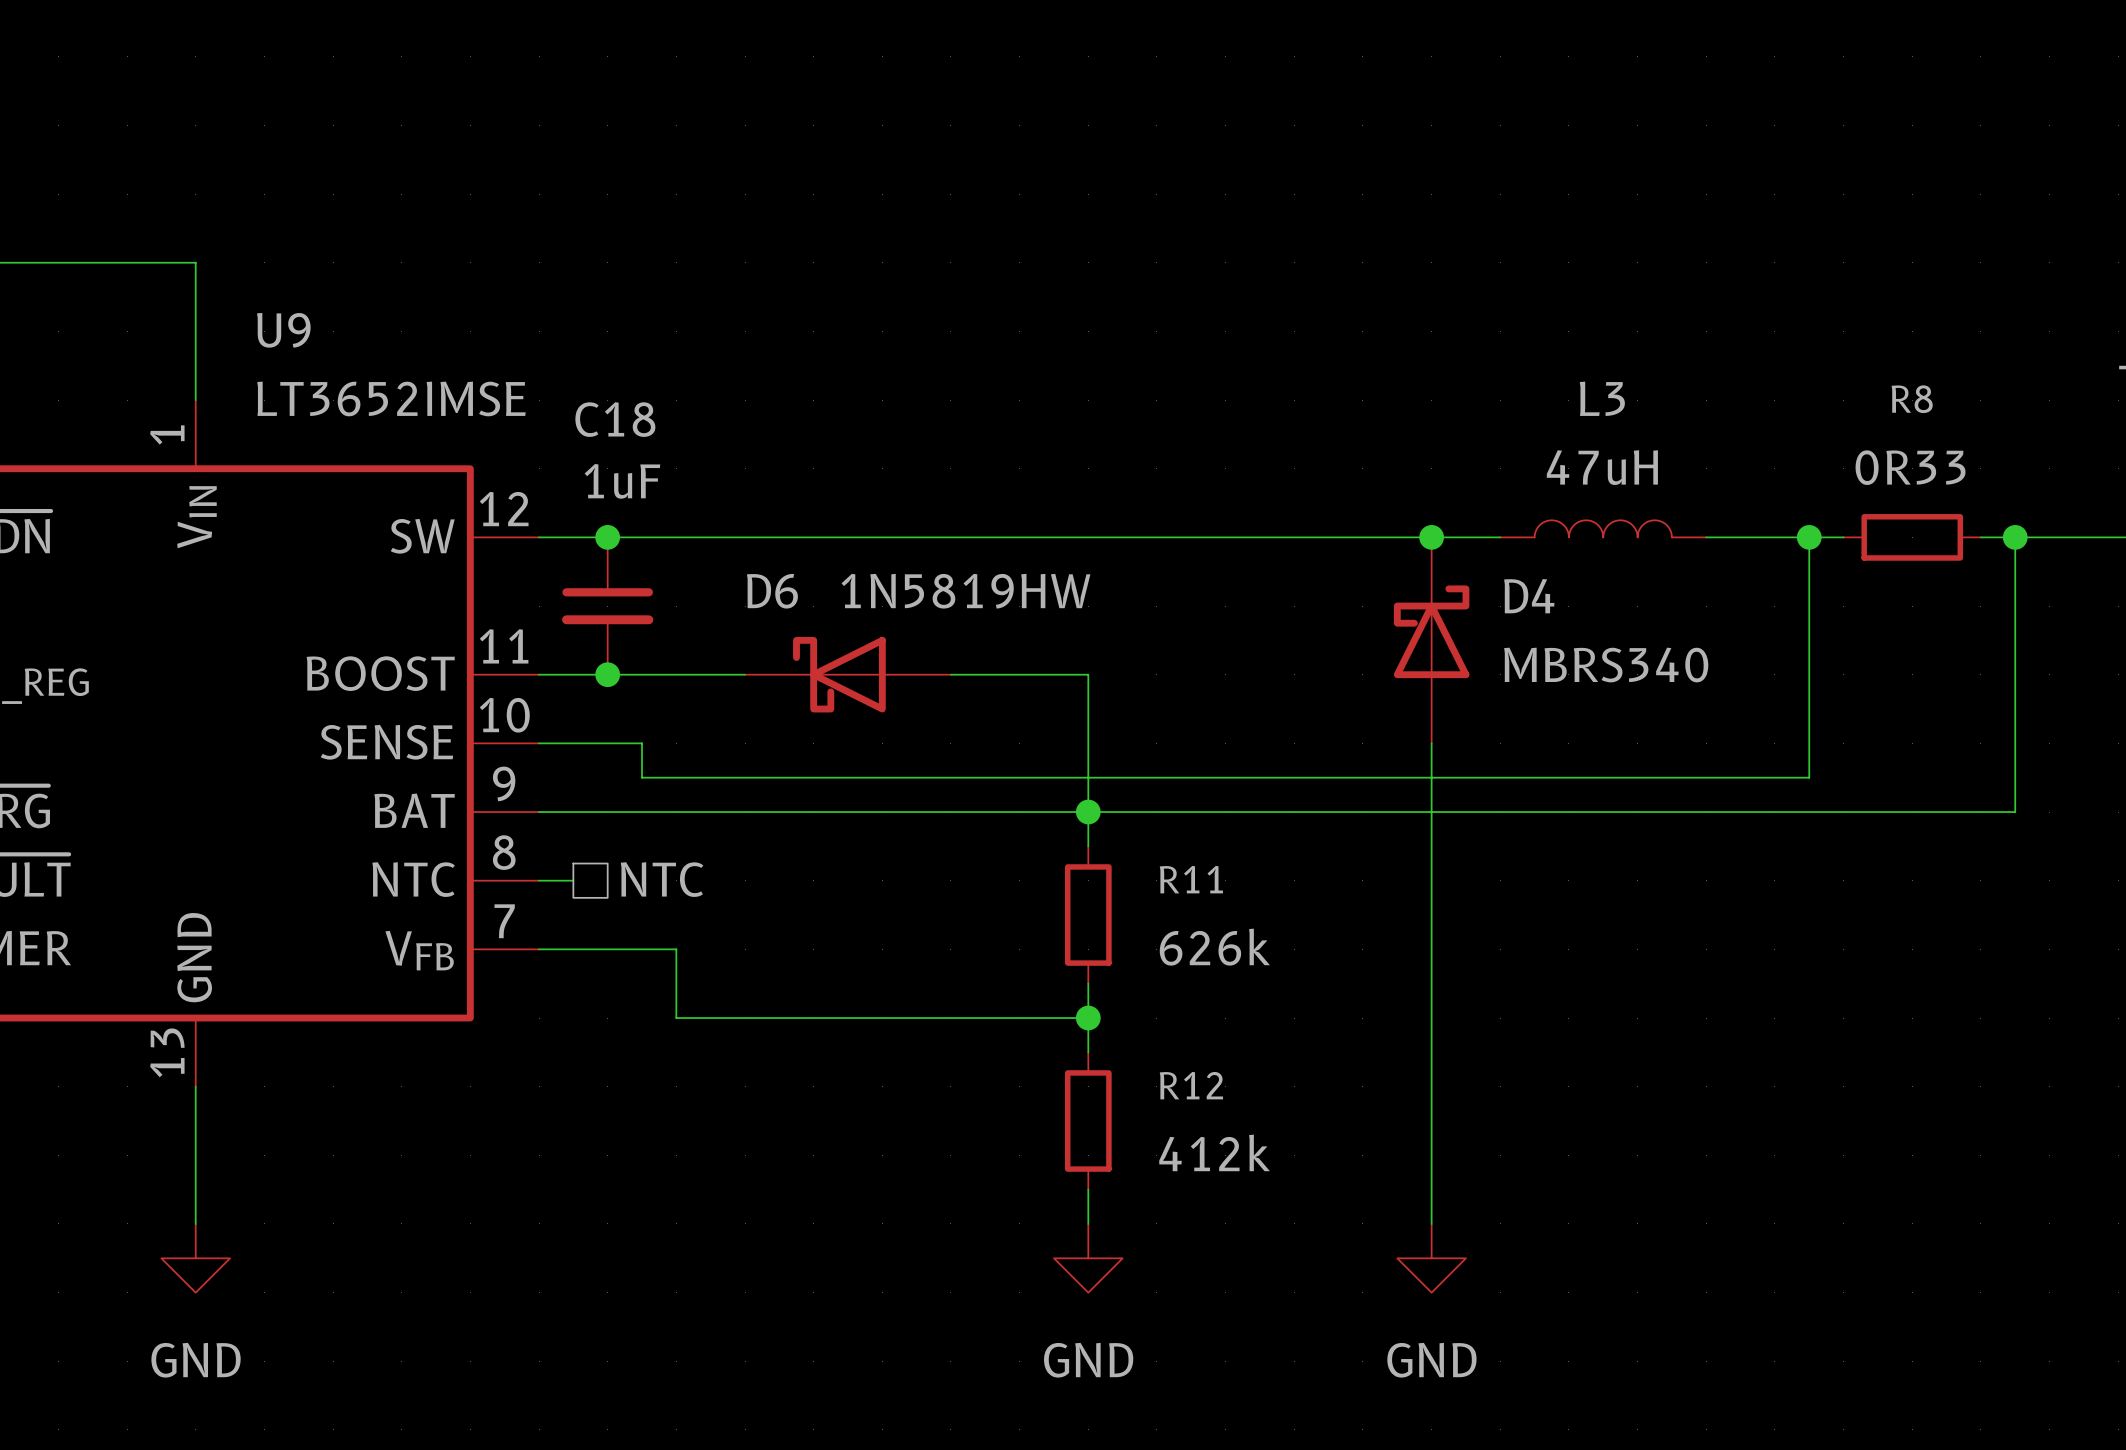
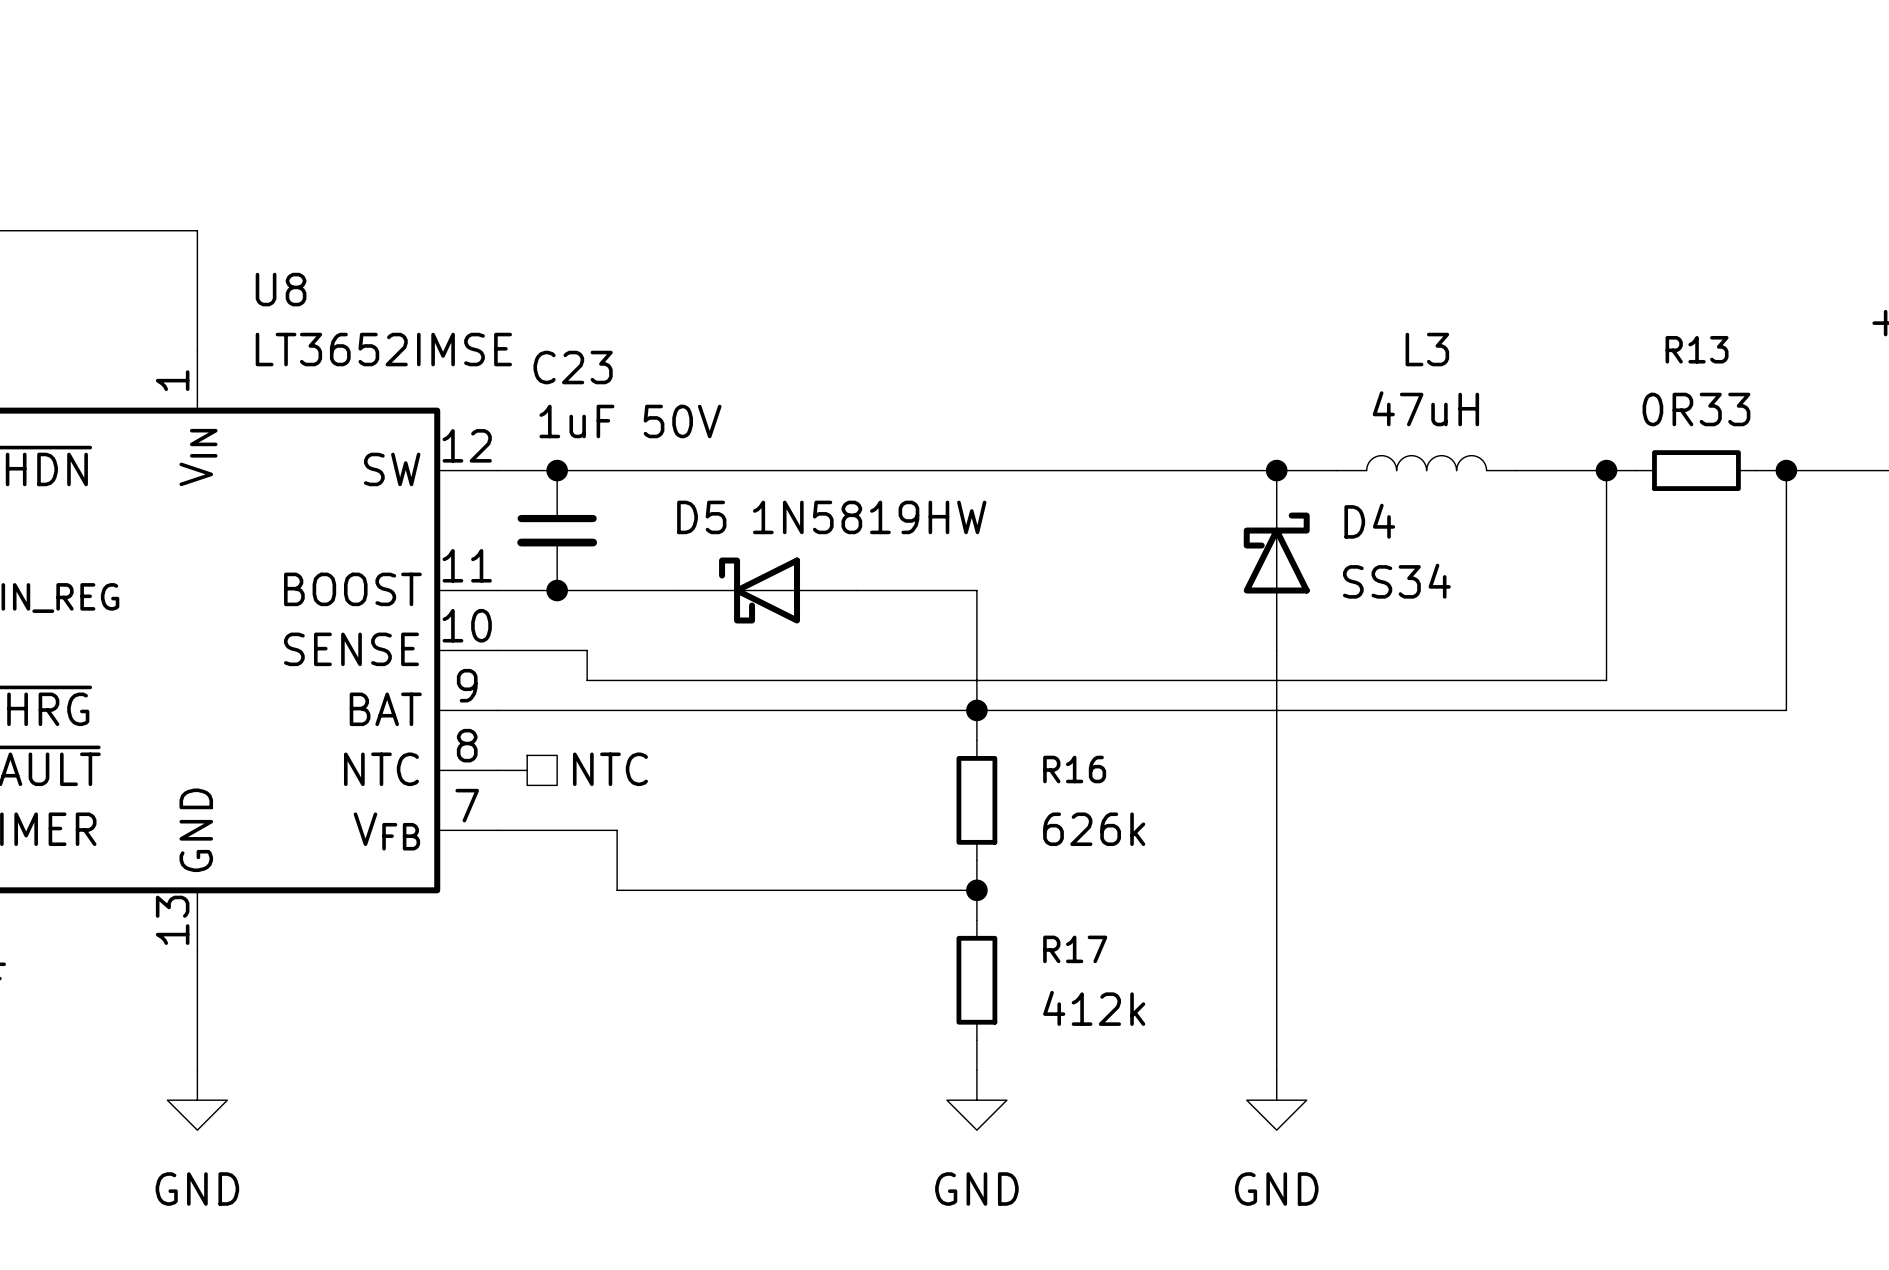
U9 name: U9 (283, 330) -> U8 (281, 289)
R8 name: R8 (1912, 399) -> R13 (1697, 349)
C18 name: C18 (615, 419) -> C23 (573, 367)
C18 value: 1uF (622, 481) -> 1uF 50V (630, 421)
D6 name: D6 (772, 591) -> D5 (701, 517)
D4 value: MBRS340 (1606, 665) -> SS34 (1396, 581)
R11 name: R11 (1191, 879) -> R16 (1074, 769)
R12 name: R12 (1191, 1085) -> R17 (1075, 949)

